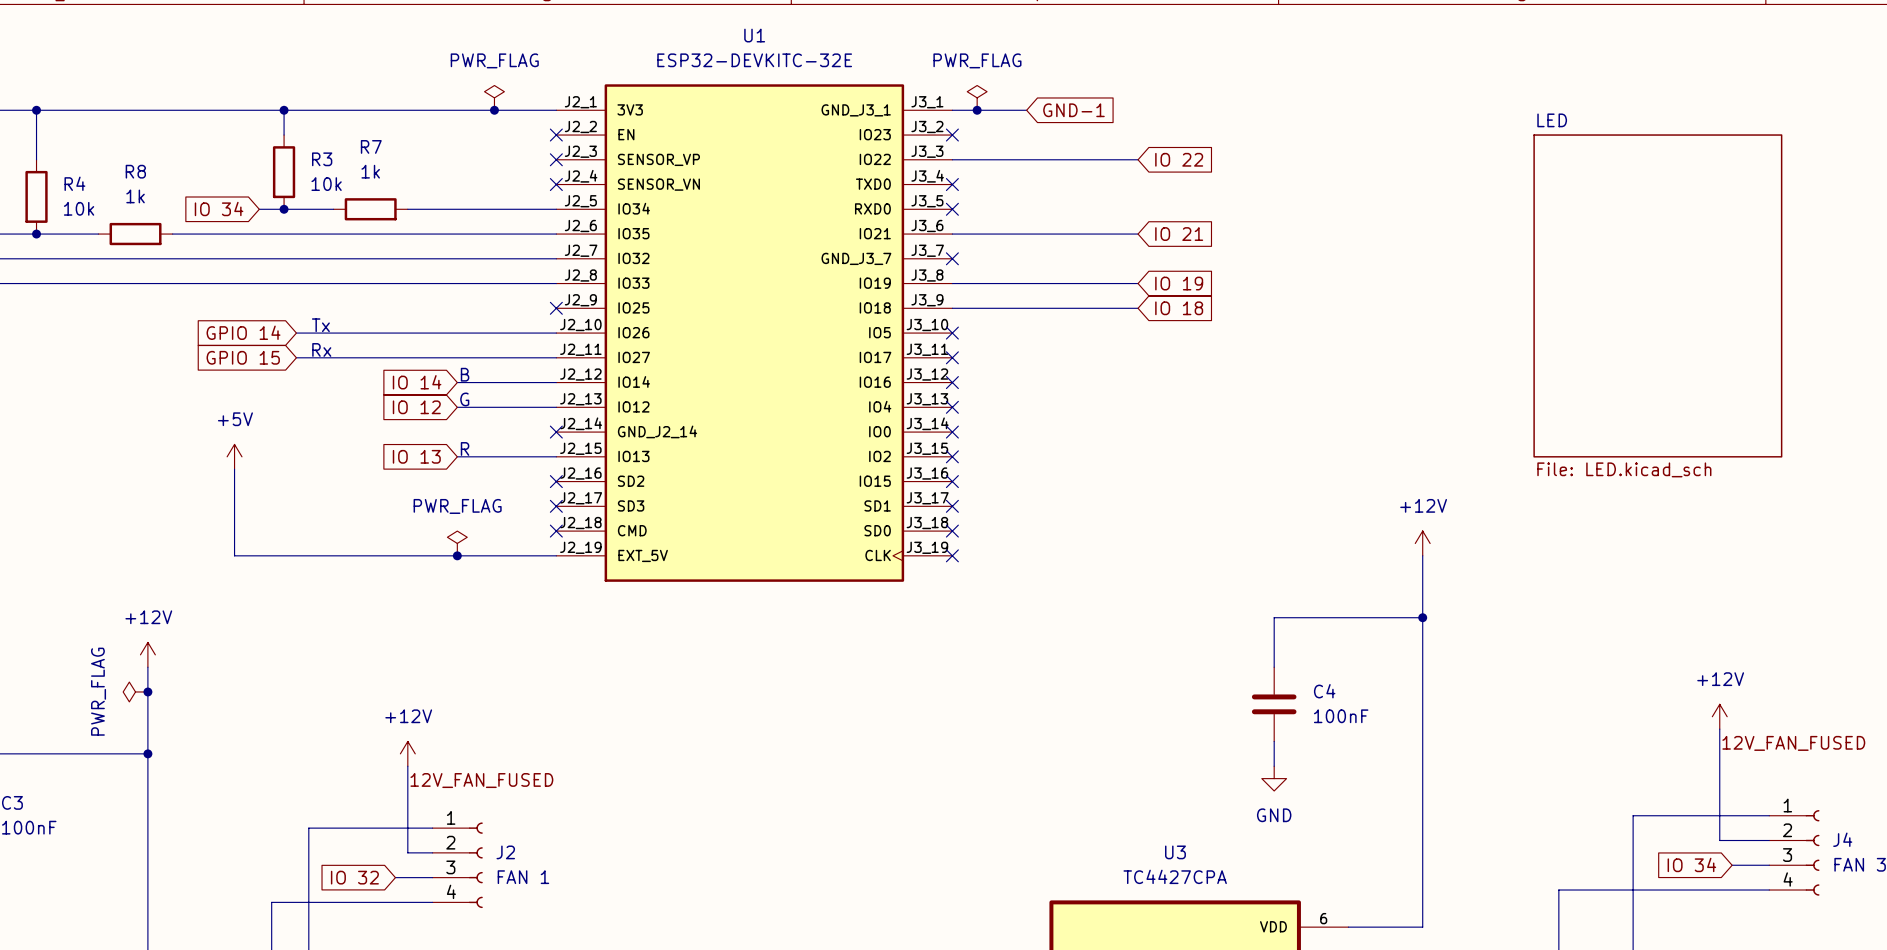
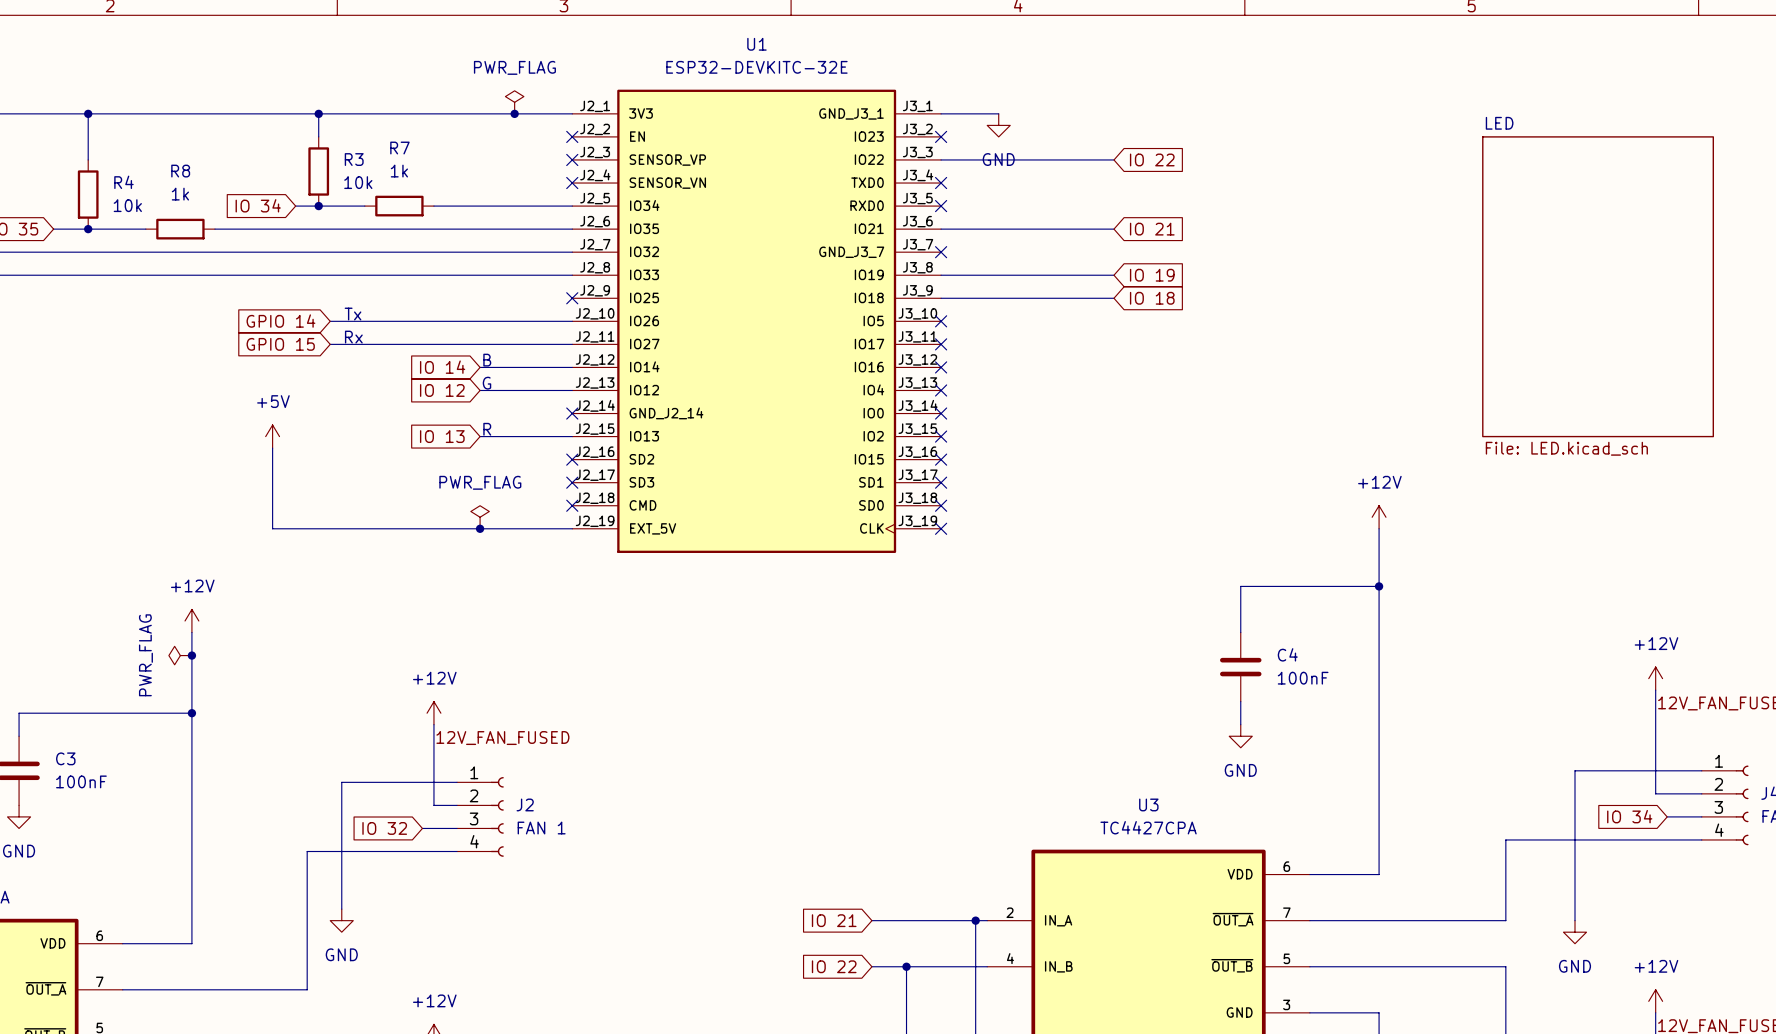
power symbol: PWR_FLAG (977, 97) -> none
junction: (977, 110) -> none
wire: (1014, 110) (1026, 110) -> none
global label: GND-1 (1073, 110) -> none
power symbol: none -> GND (998, 125)

